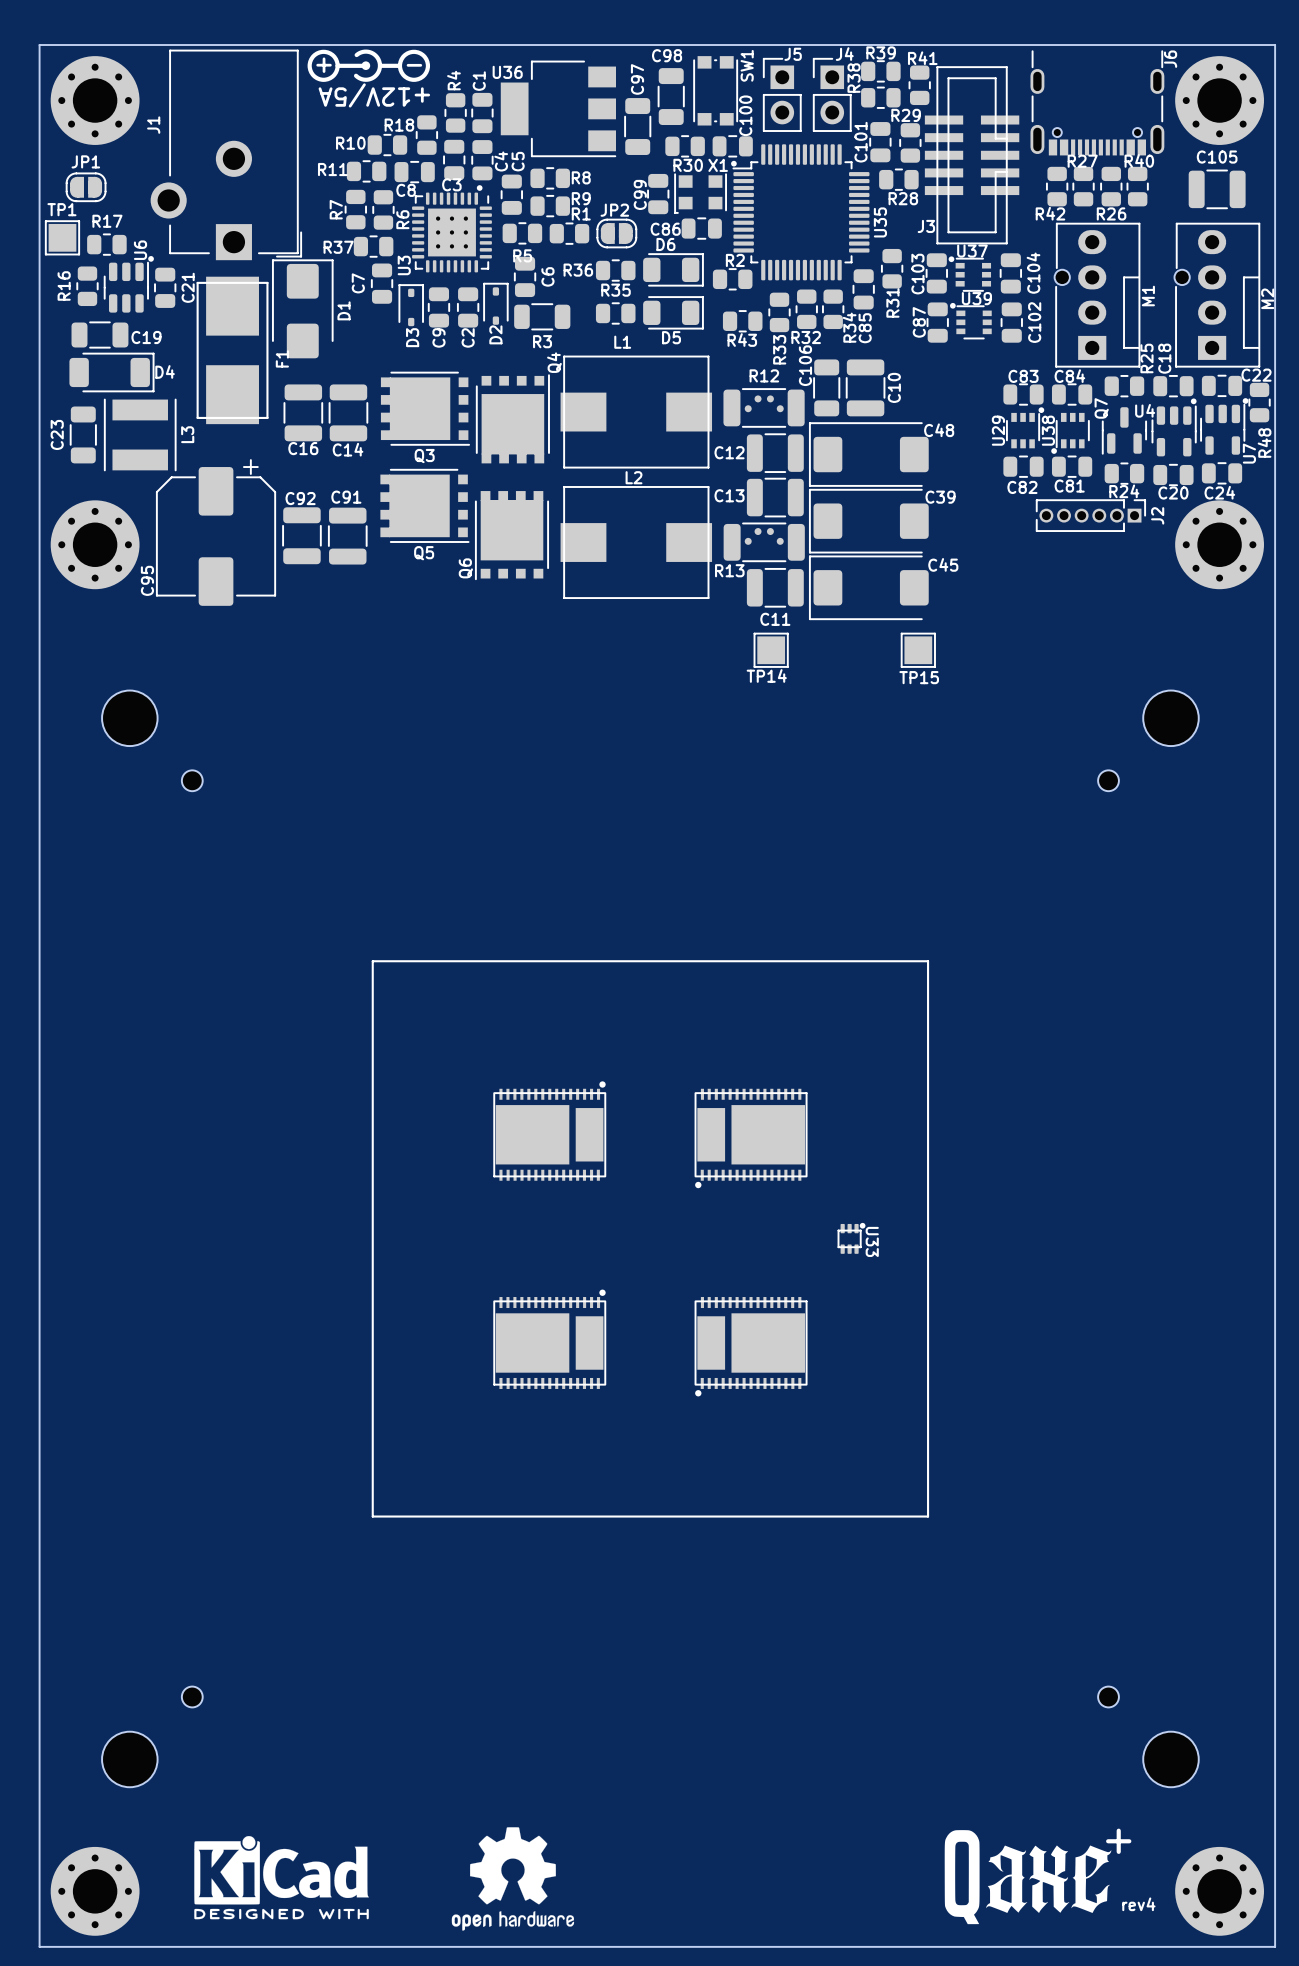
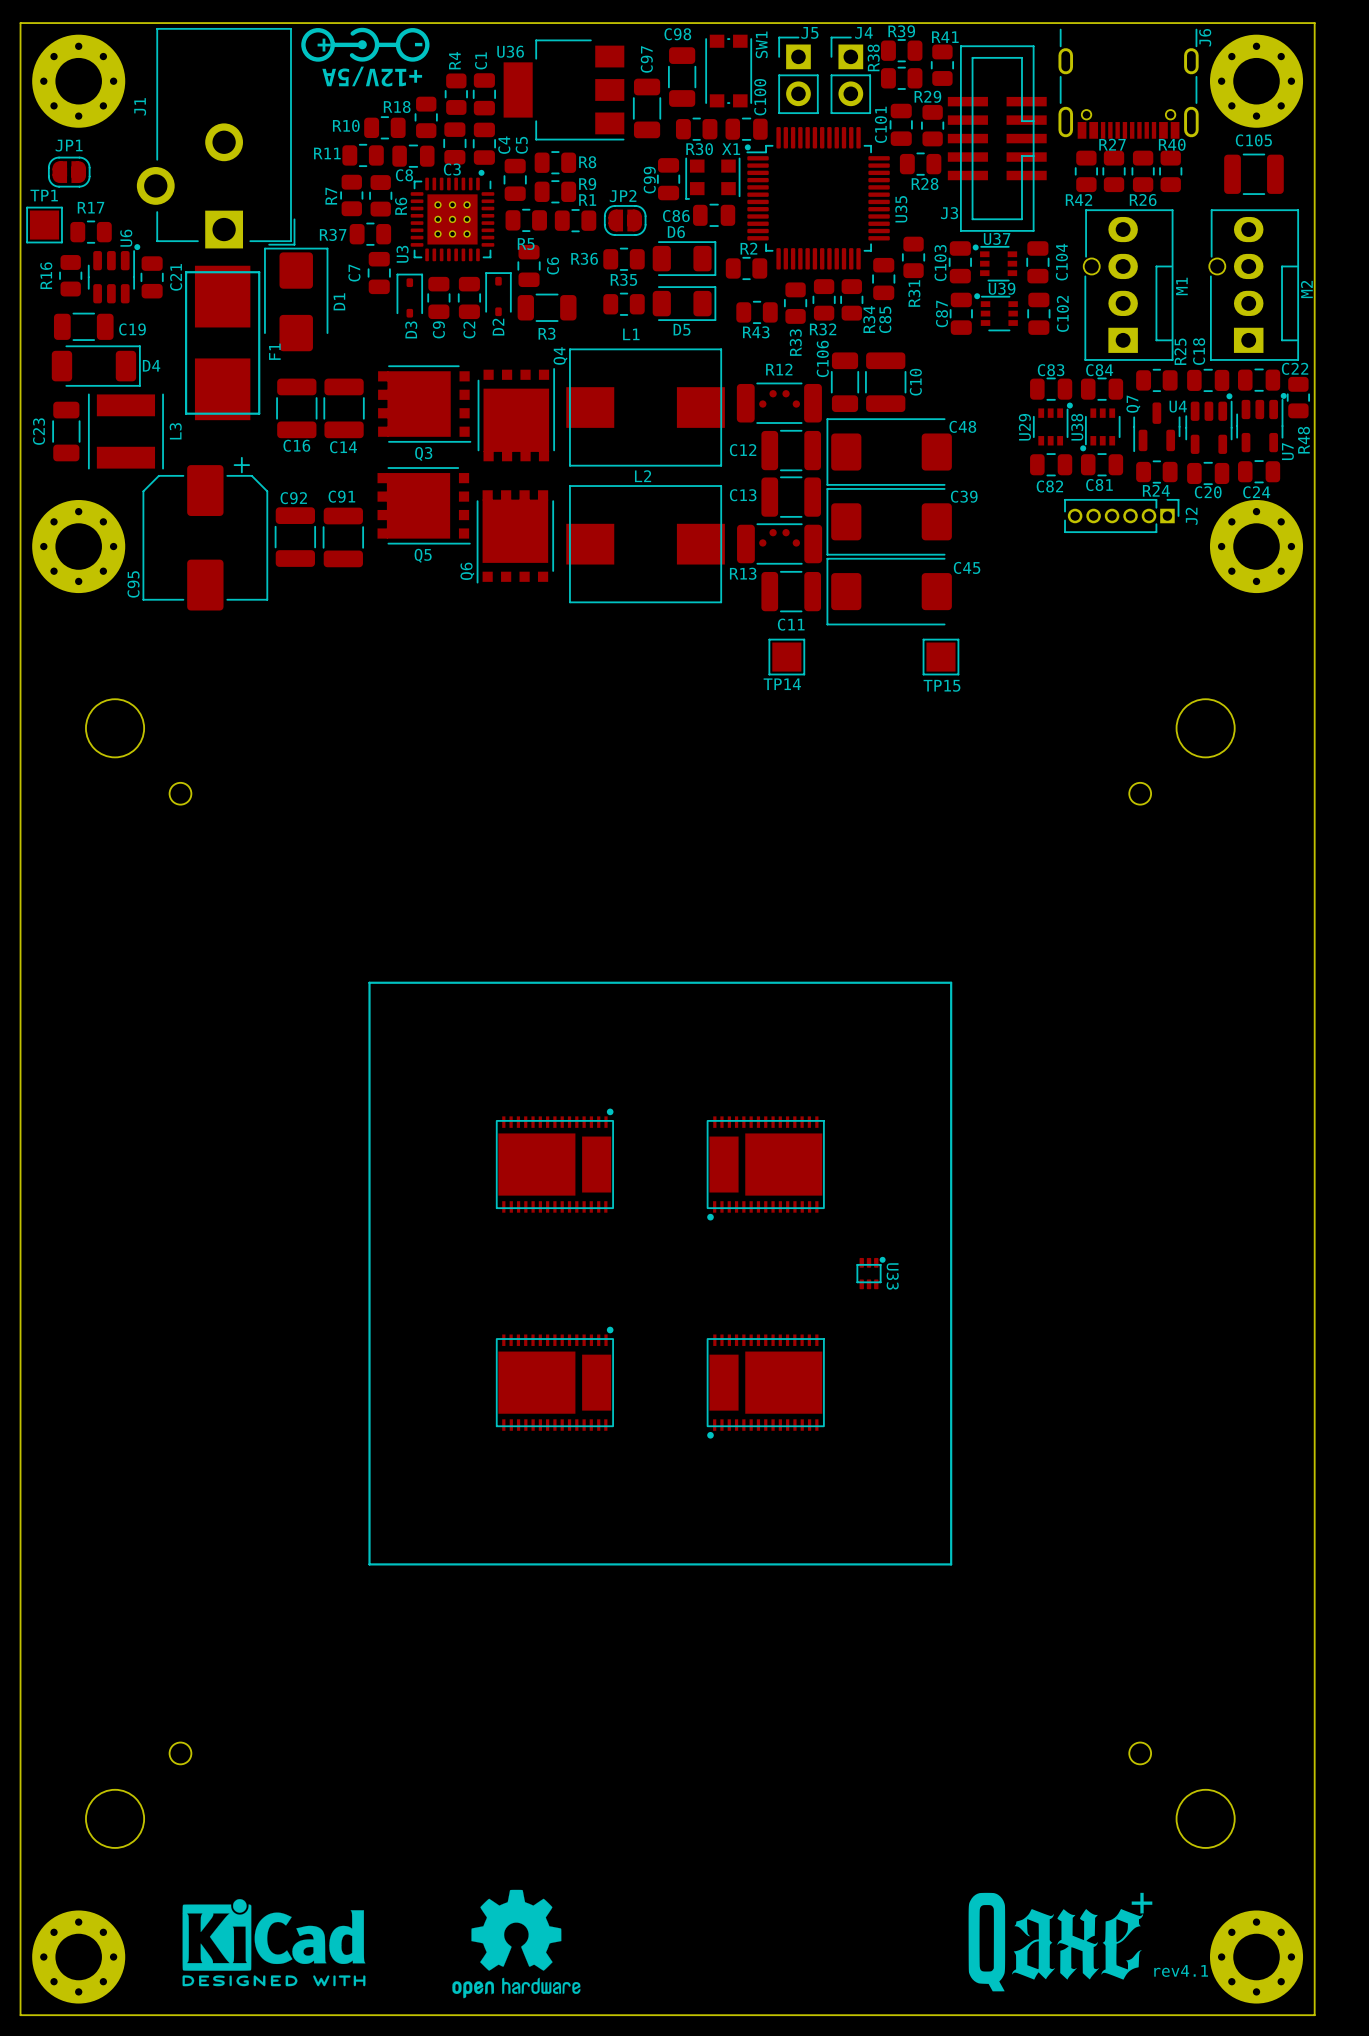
text: rev4 (1138, 1904) -> rev4.1 (1181, 1970)

